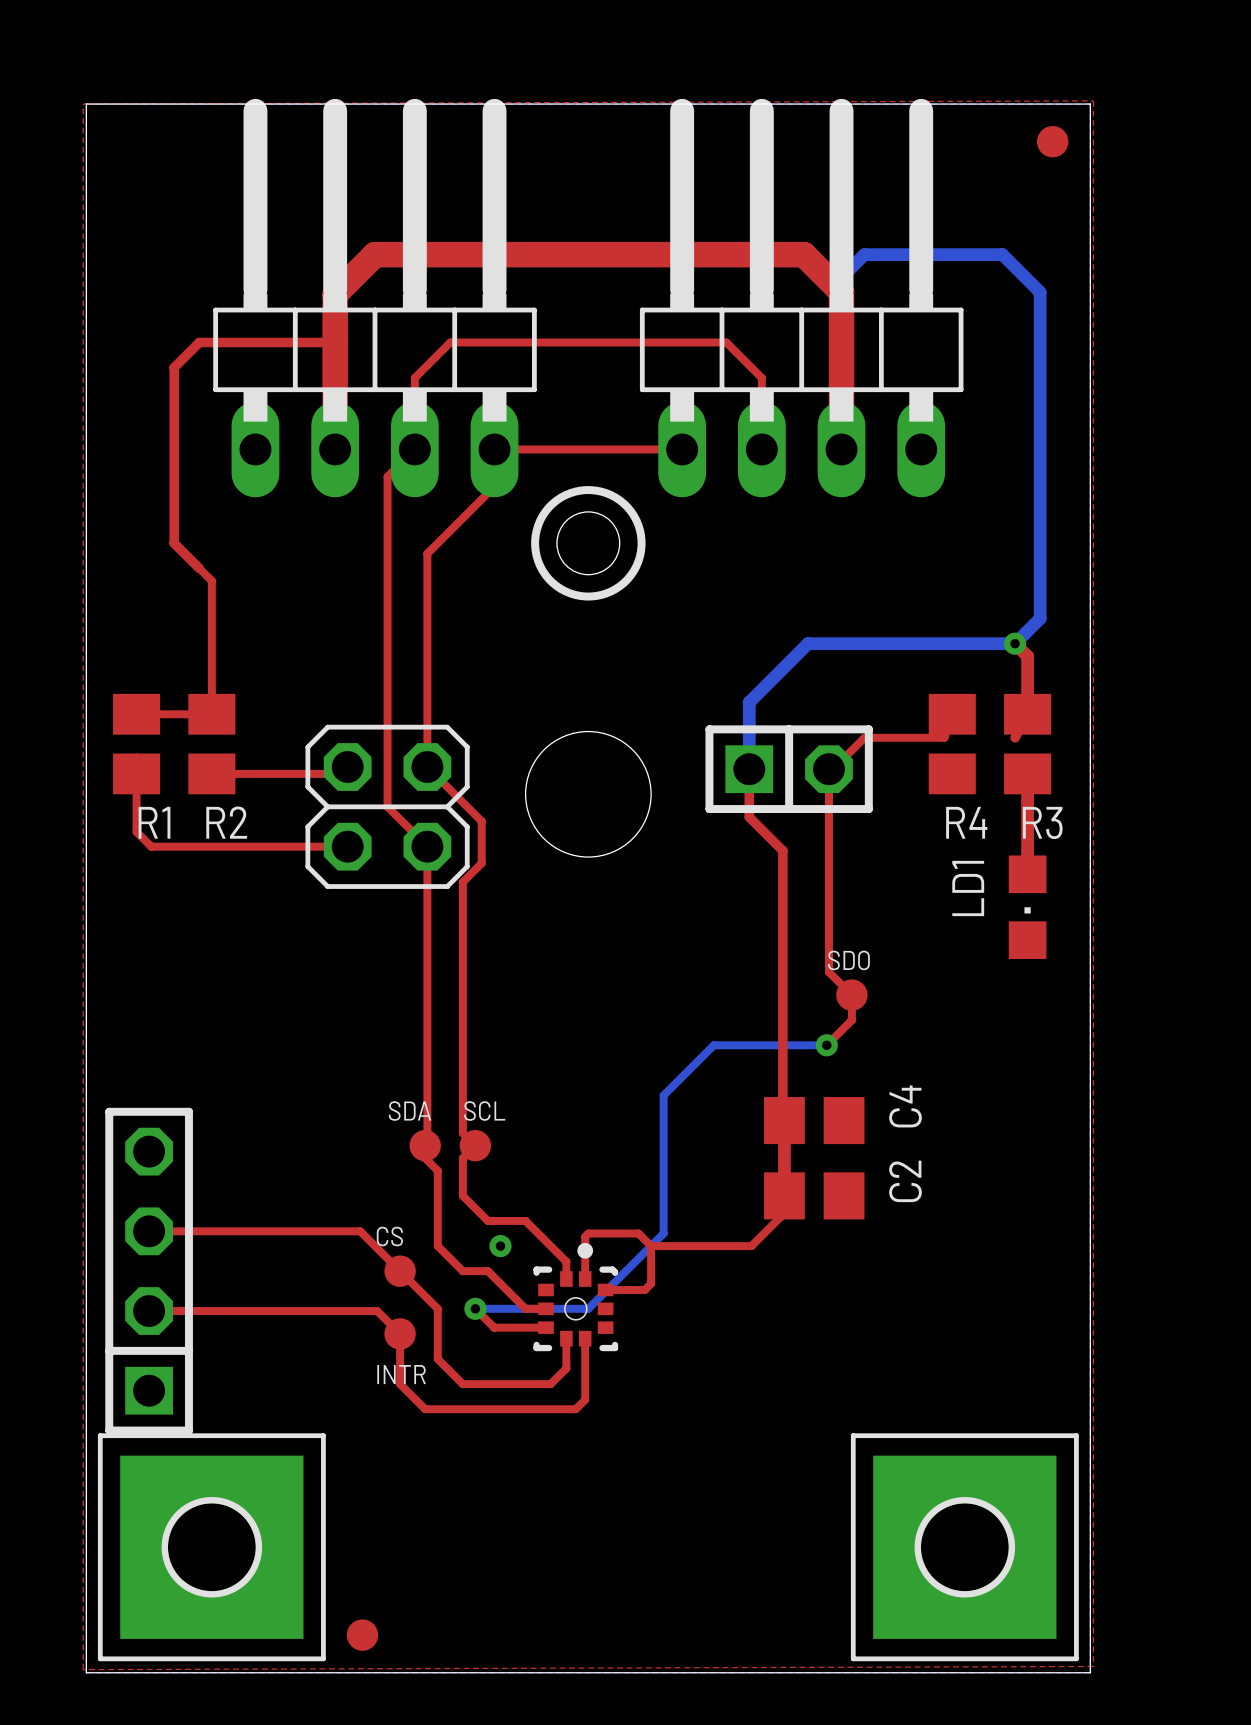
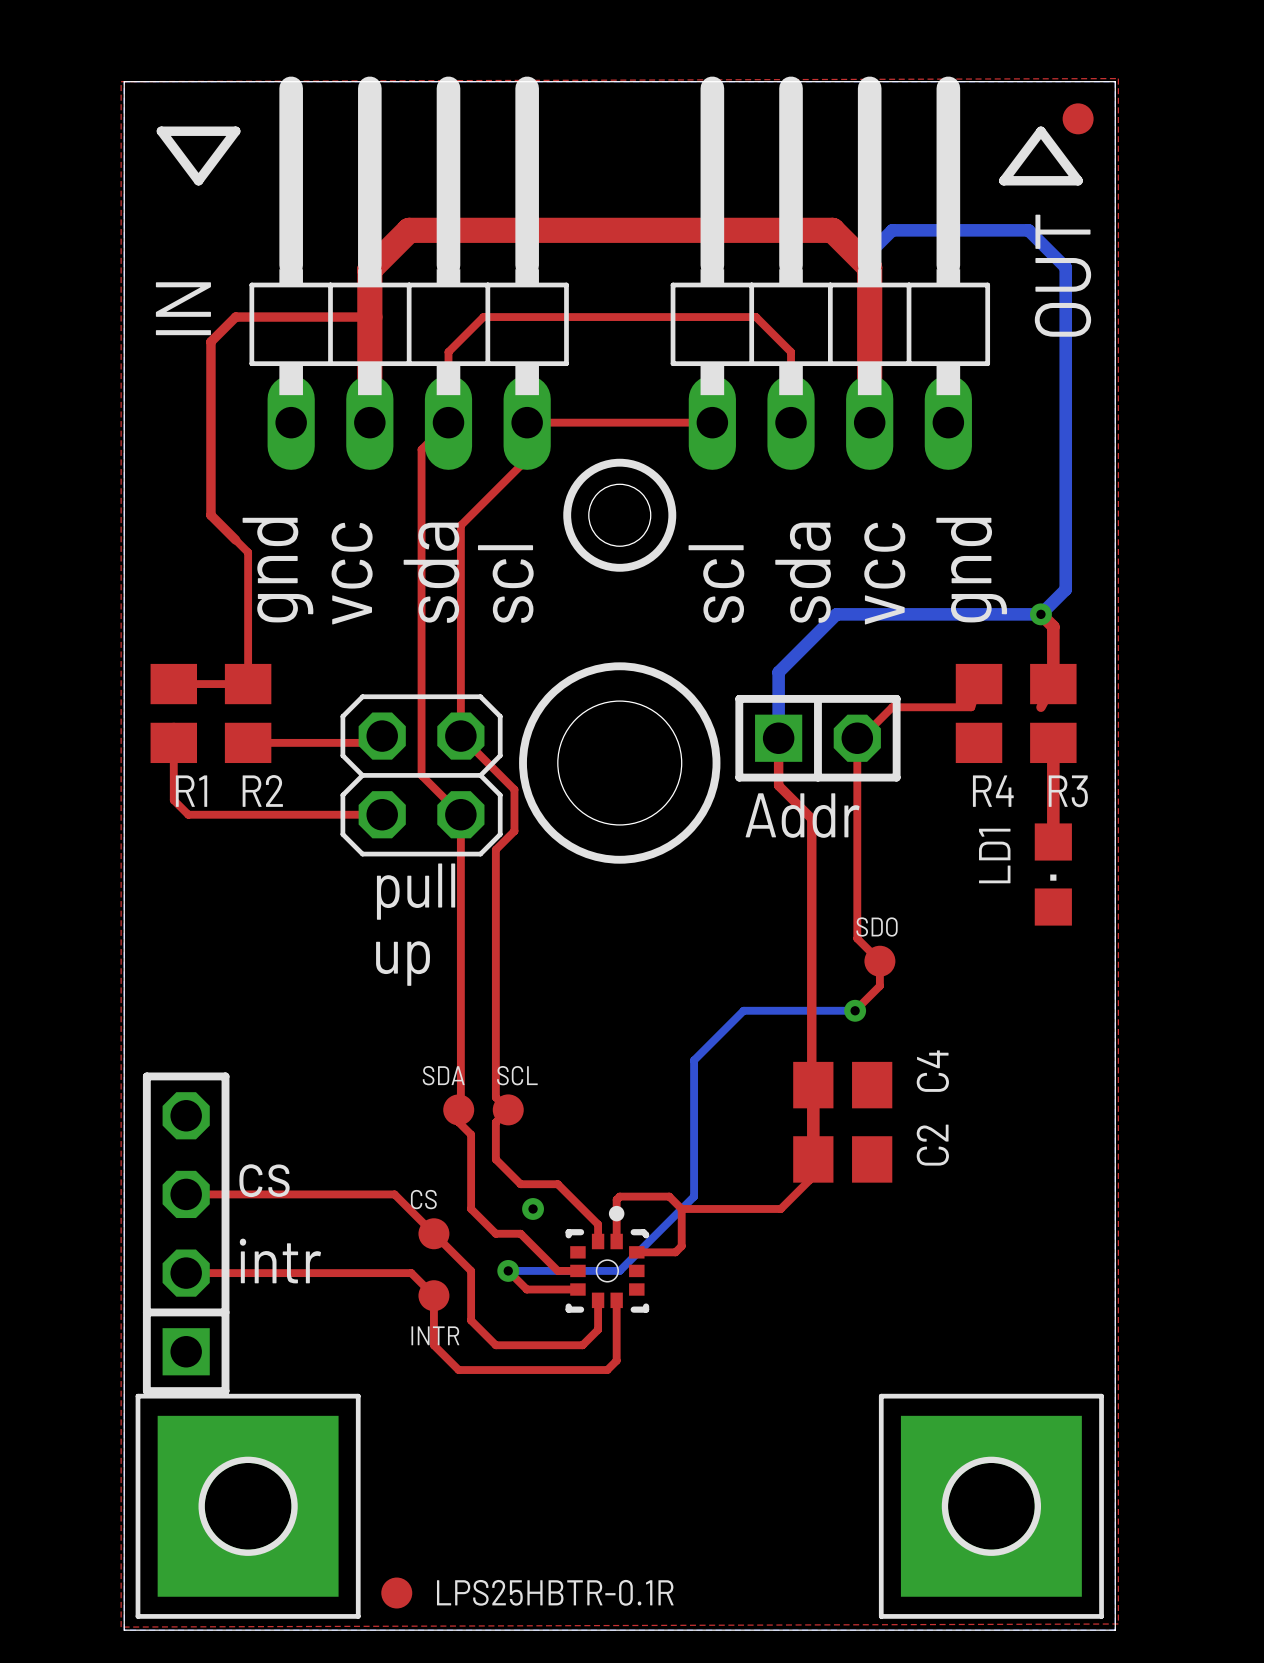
line: none -> (161, 131) (235, 131) (198, 180) (161, 131)
line: none -> (1040, 131) (1003, 180) (1078, 180) (1040, 131)
text: none -> OUT (1062, 275)
text: none -> IN (183, 308)
text: none -> gnd (277, 570)
text: none -> gnd (971, 570)
text: none -> sda (431, 572)
text: none -> sda (803, 572)
text: none -> vcc (352, 573)
text: none -> vcc (884, 573)
text: none -> scl (505, 583)
text: none -> scl (716, 583)
drawing: none -> [519, 662, 721, 864]
text: none -> Addr (802, 815)
text: none -> pull (416, 891)
text: none -> up (403, 963)
text: none -> cs (264, 1180)
text: none -> intr (280, 1261)
text: none -> LPS25HBTR-0.1R (555, 1592)

